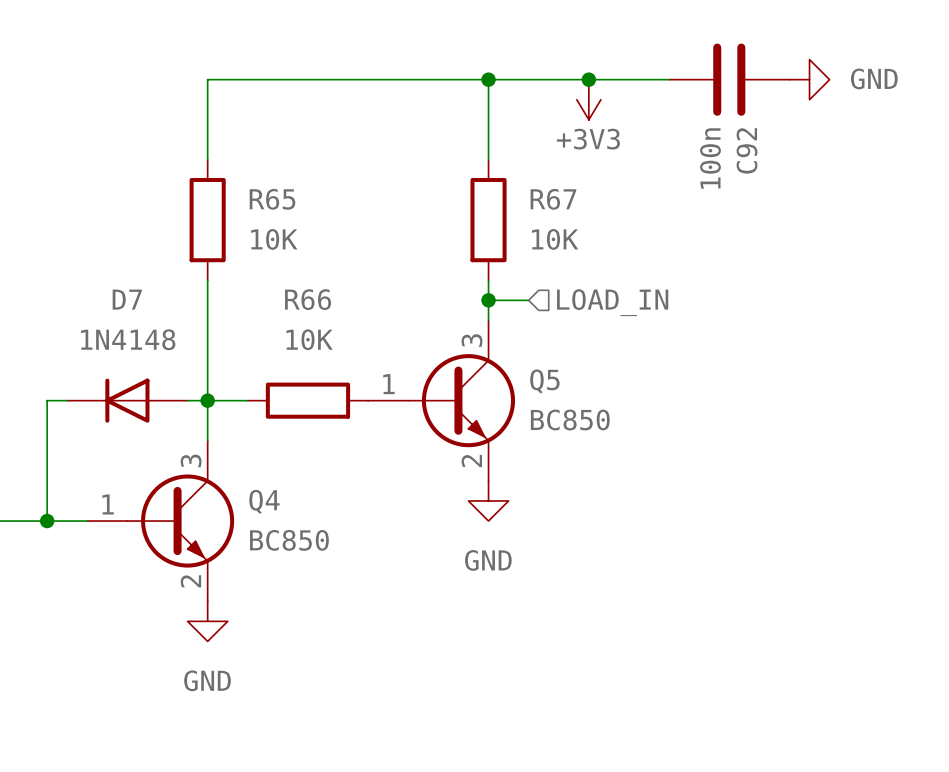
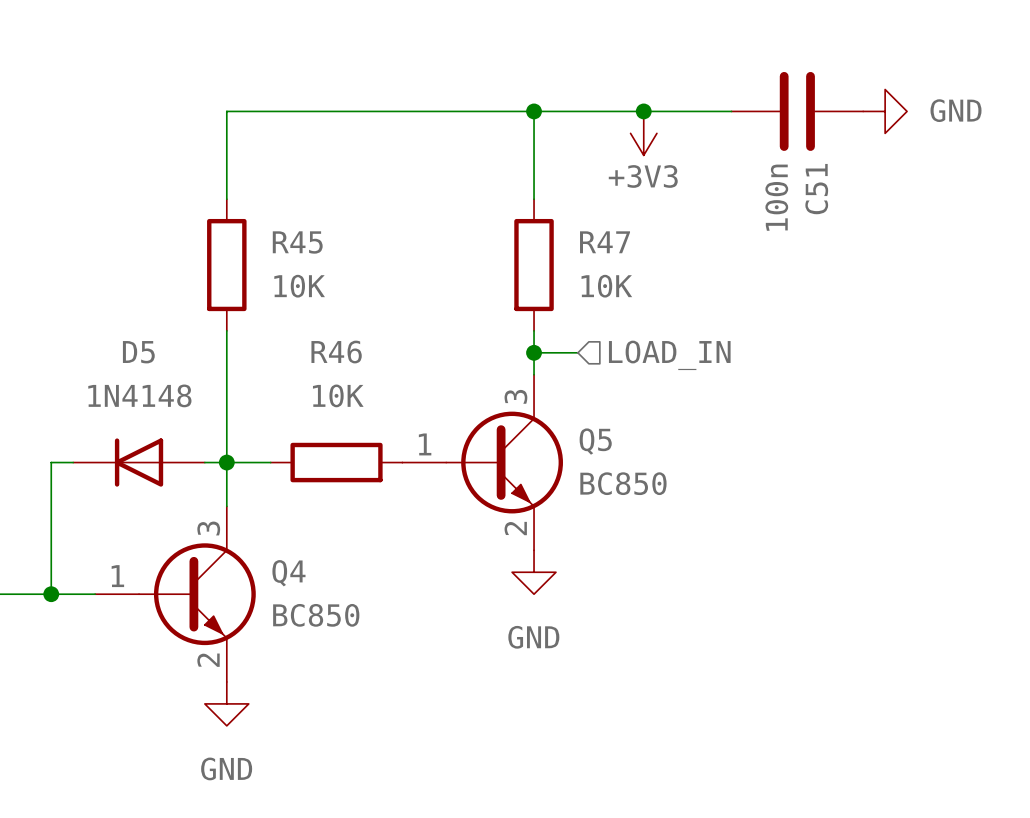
C92 name: C92 (747, 150) -> C51 (816, 189)
R65 name: R65 (272, 199) -> R45 (297, 242)
R67 name: R67 (553, 199) -> R47 (605, 242)
D7 name: D7 (127, 299) -> D5 (138, 352)
R66 name: R66 (308, 299) -> R46 (336, 352)

